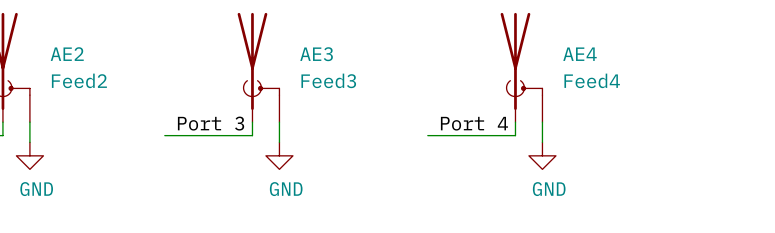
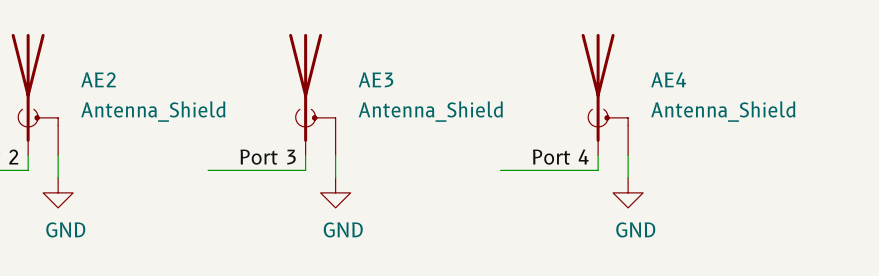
AE2 value: Feed2 (79, 80) -> Antenna_Shield (153, 111)
AE3 value: Feed3 (328, 80) -> Antenna_Shield (430, 111)
AE4 value: Feed4 (592, 80) -> Antenna_Shield (723, 111)

